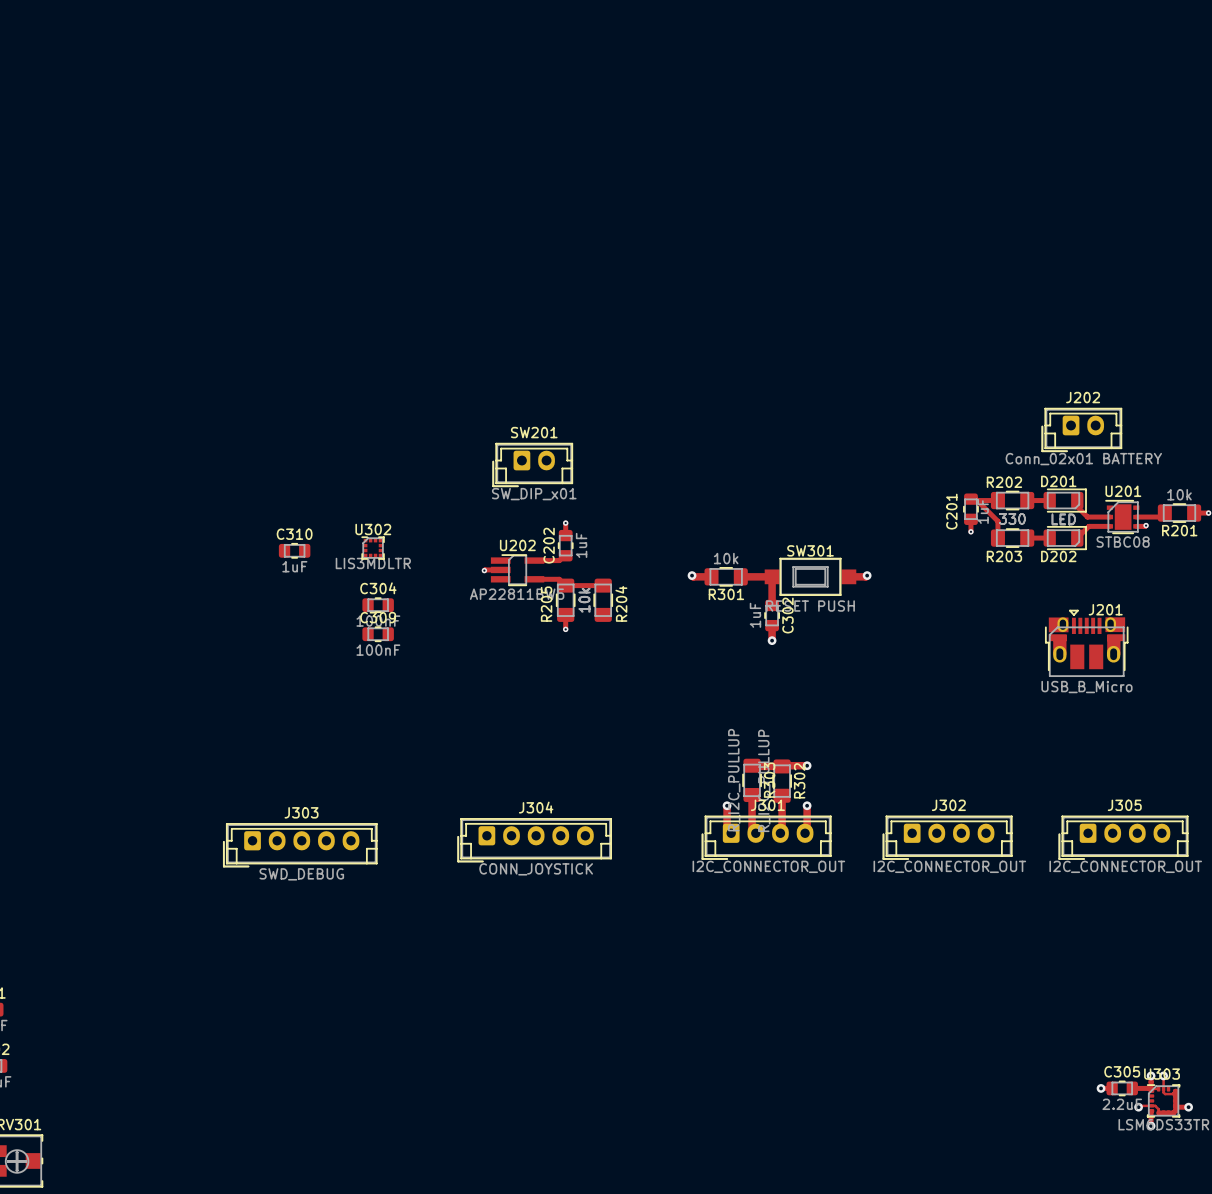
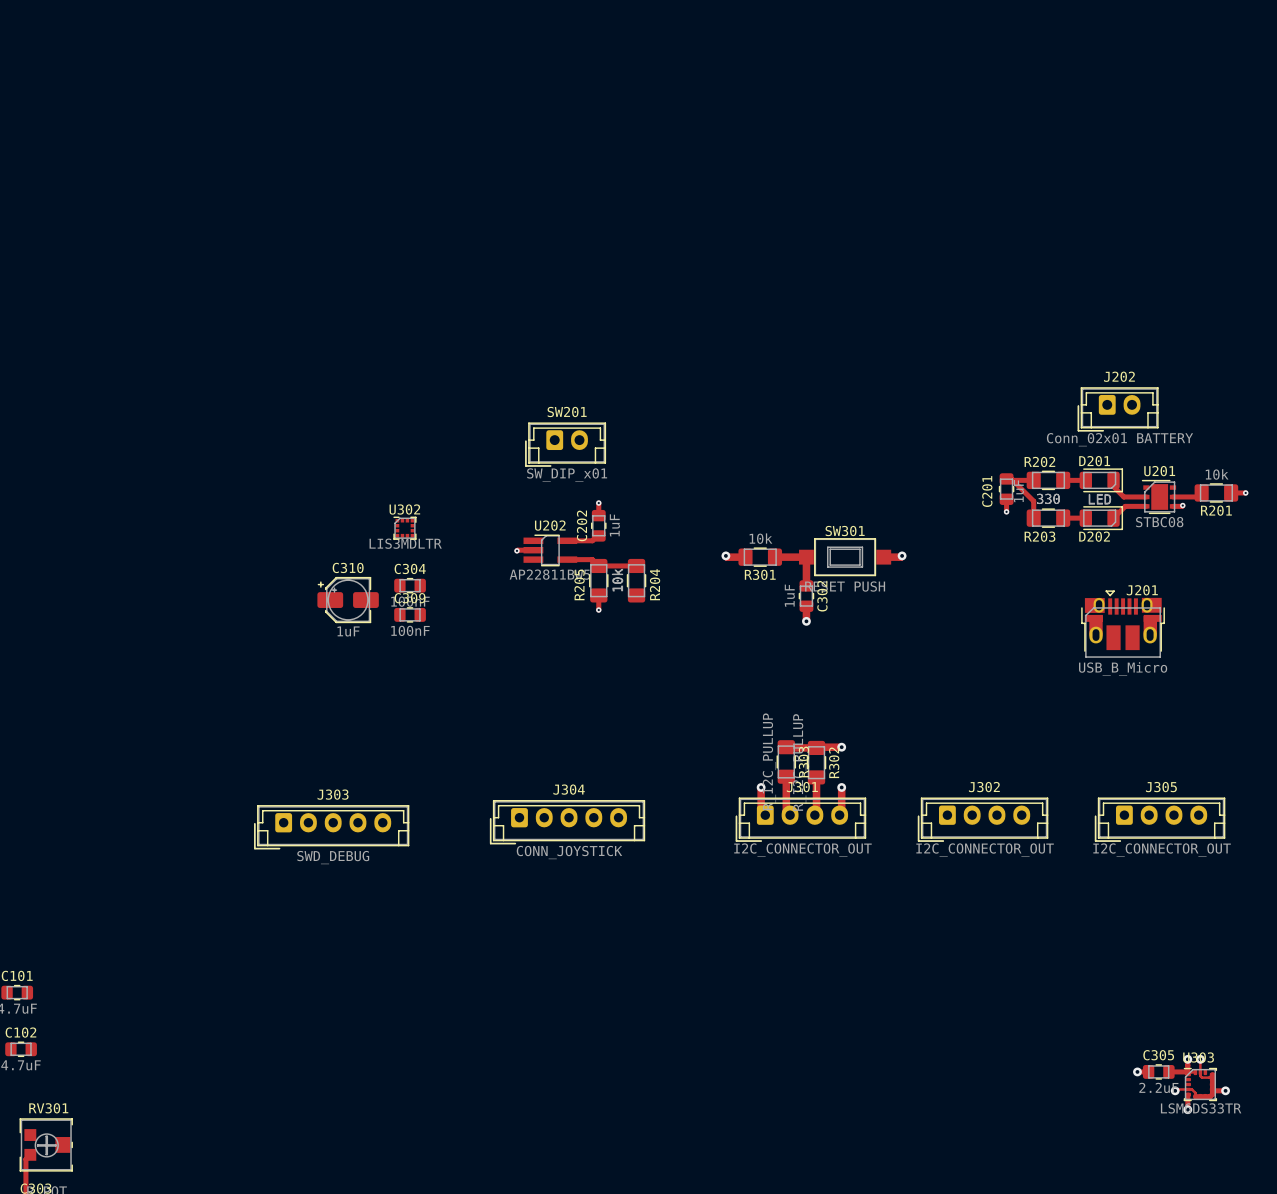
C310 footprint: [278, 543, 311, 559] -> [317, 577, 379, 624]

